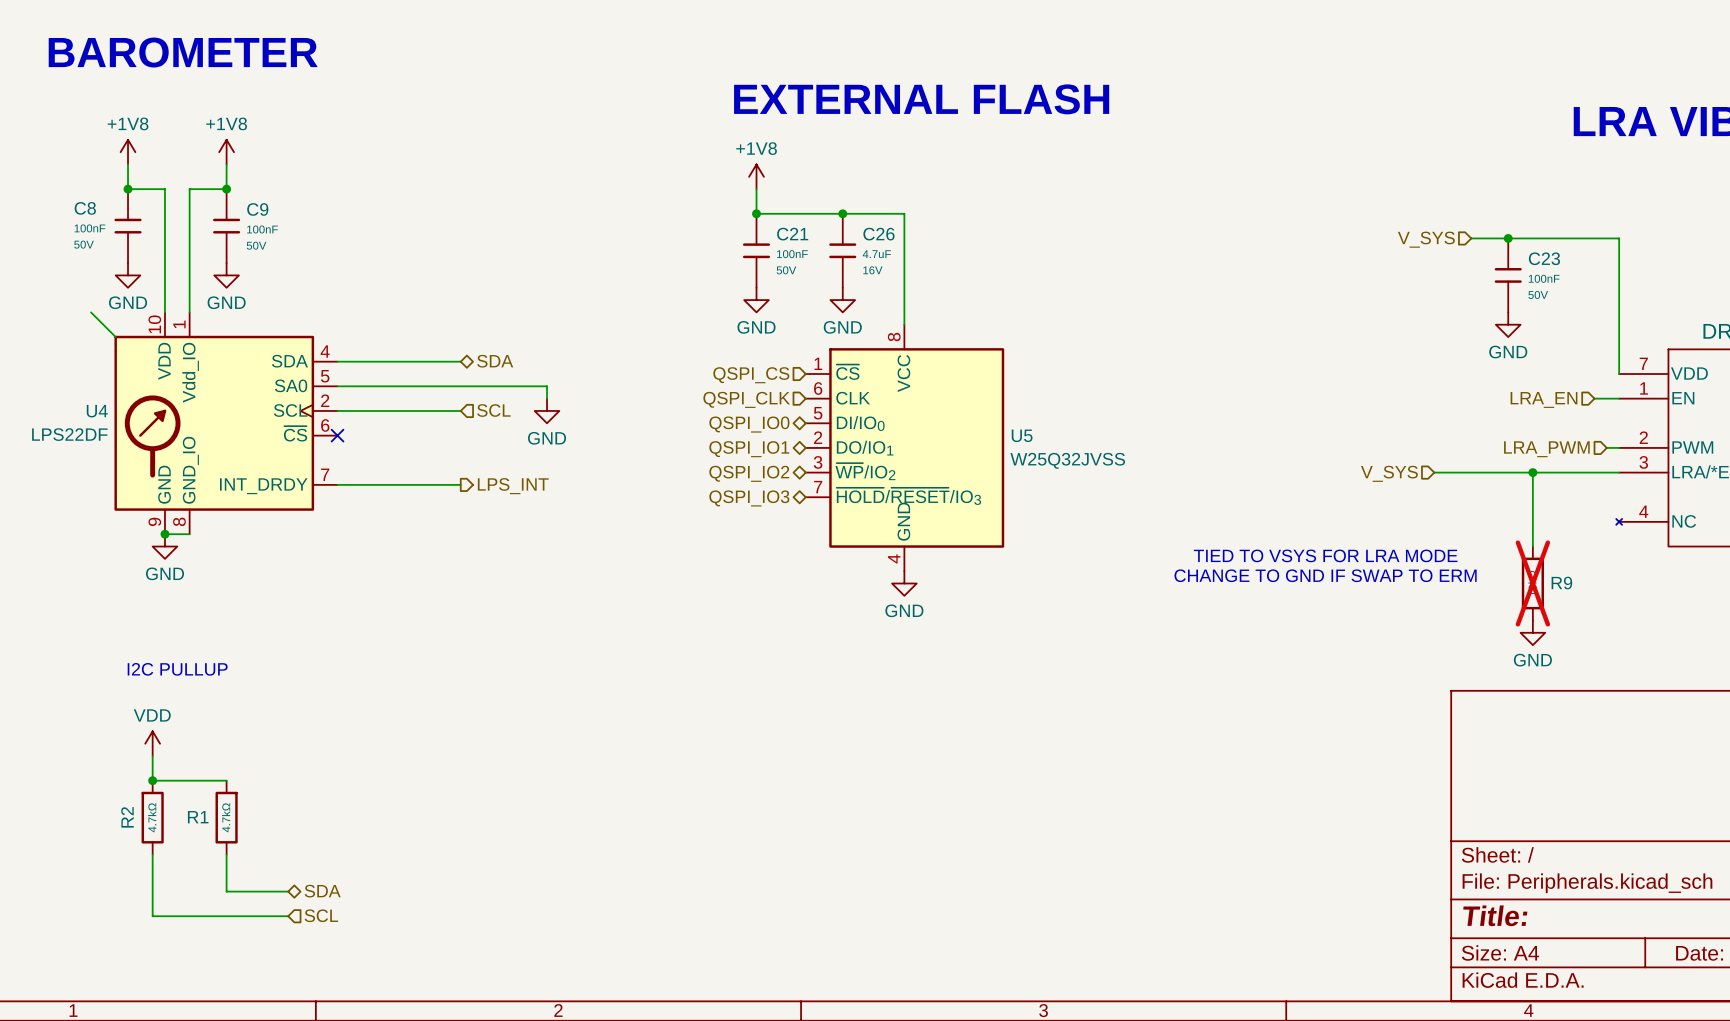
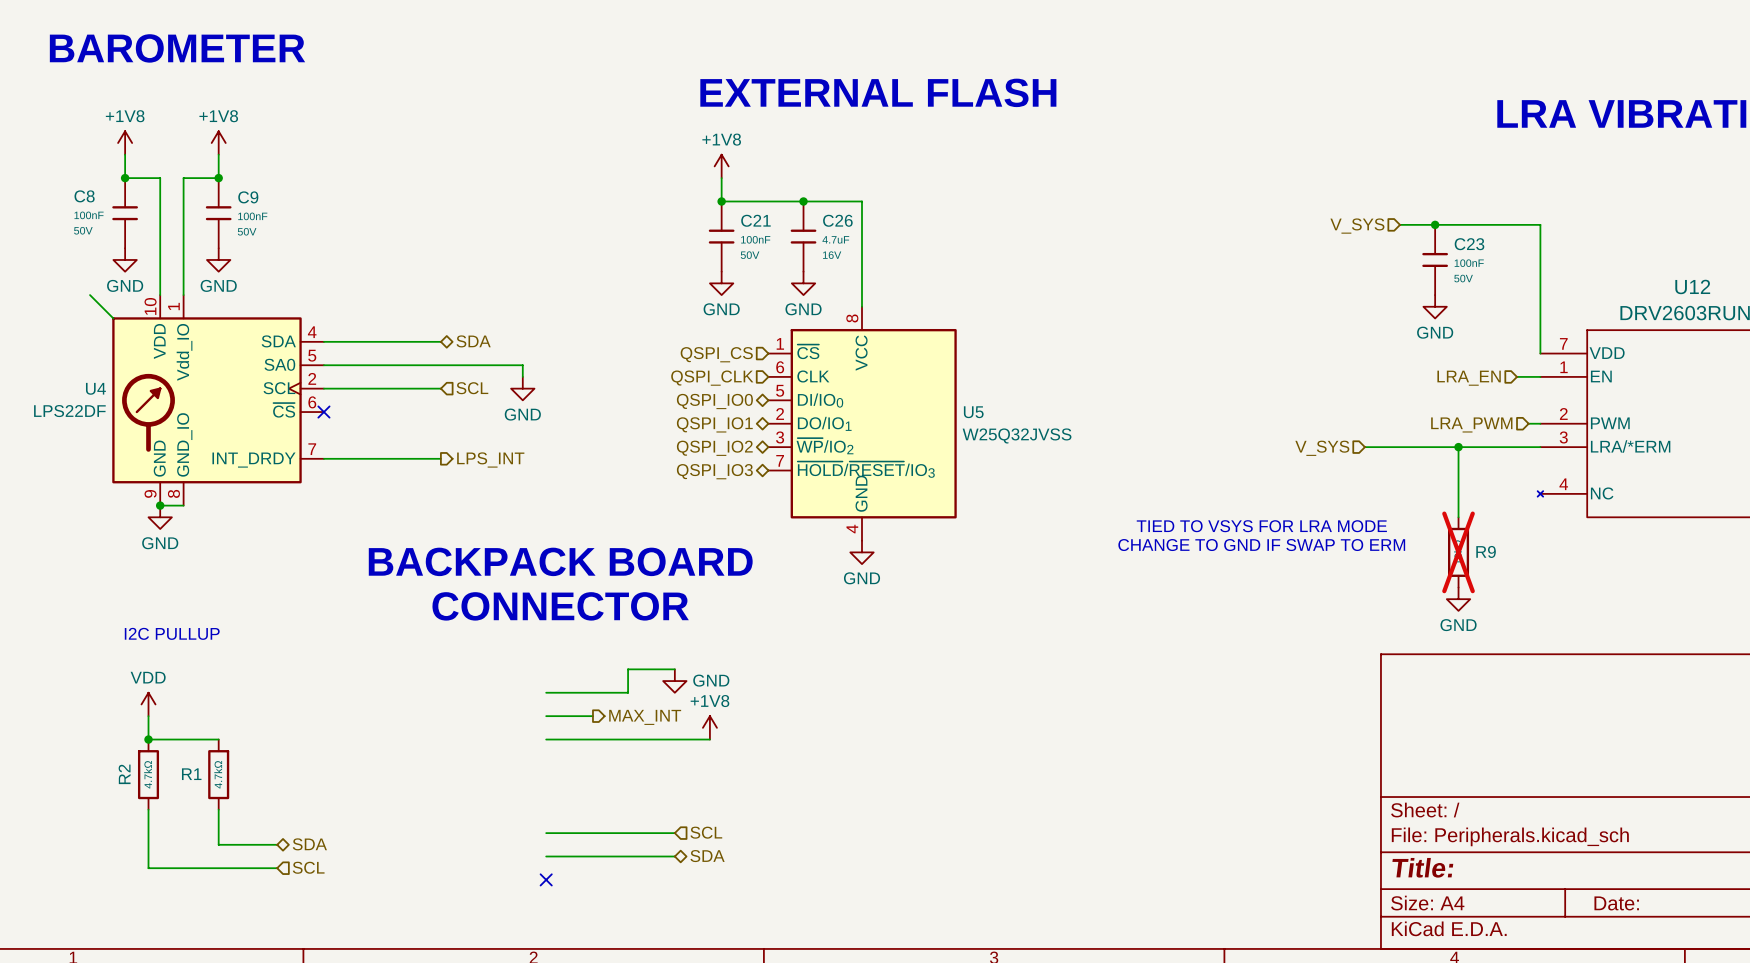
text: none -> BACKPACK BOARD (560, 561)
text: none -> CONNECTOR (560, 606)
wire: none -> (674, 669) (628, 669) (628, 692) (546, 692)
power symbol: none -> GND (674, 681)
wire: none -> (546, 716) (592, 716)
hierarchical label: none -> MAX_INT (645, 717)
power symbol: none -> +1V8 (709, 727)
wire: none -> (546, 739) (709, 739)
hierarchical label: none -> SCL (706, 832)
wire: none -> (546, 833) (674, 833)
wire: none -> (546, 856) (674, 856)
hierarchical label: none -> SDA (707, 856)
no-connect mark: none -> (546, 879)

